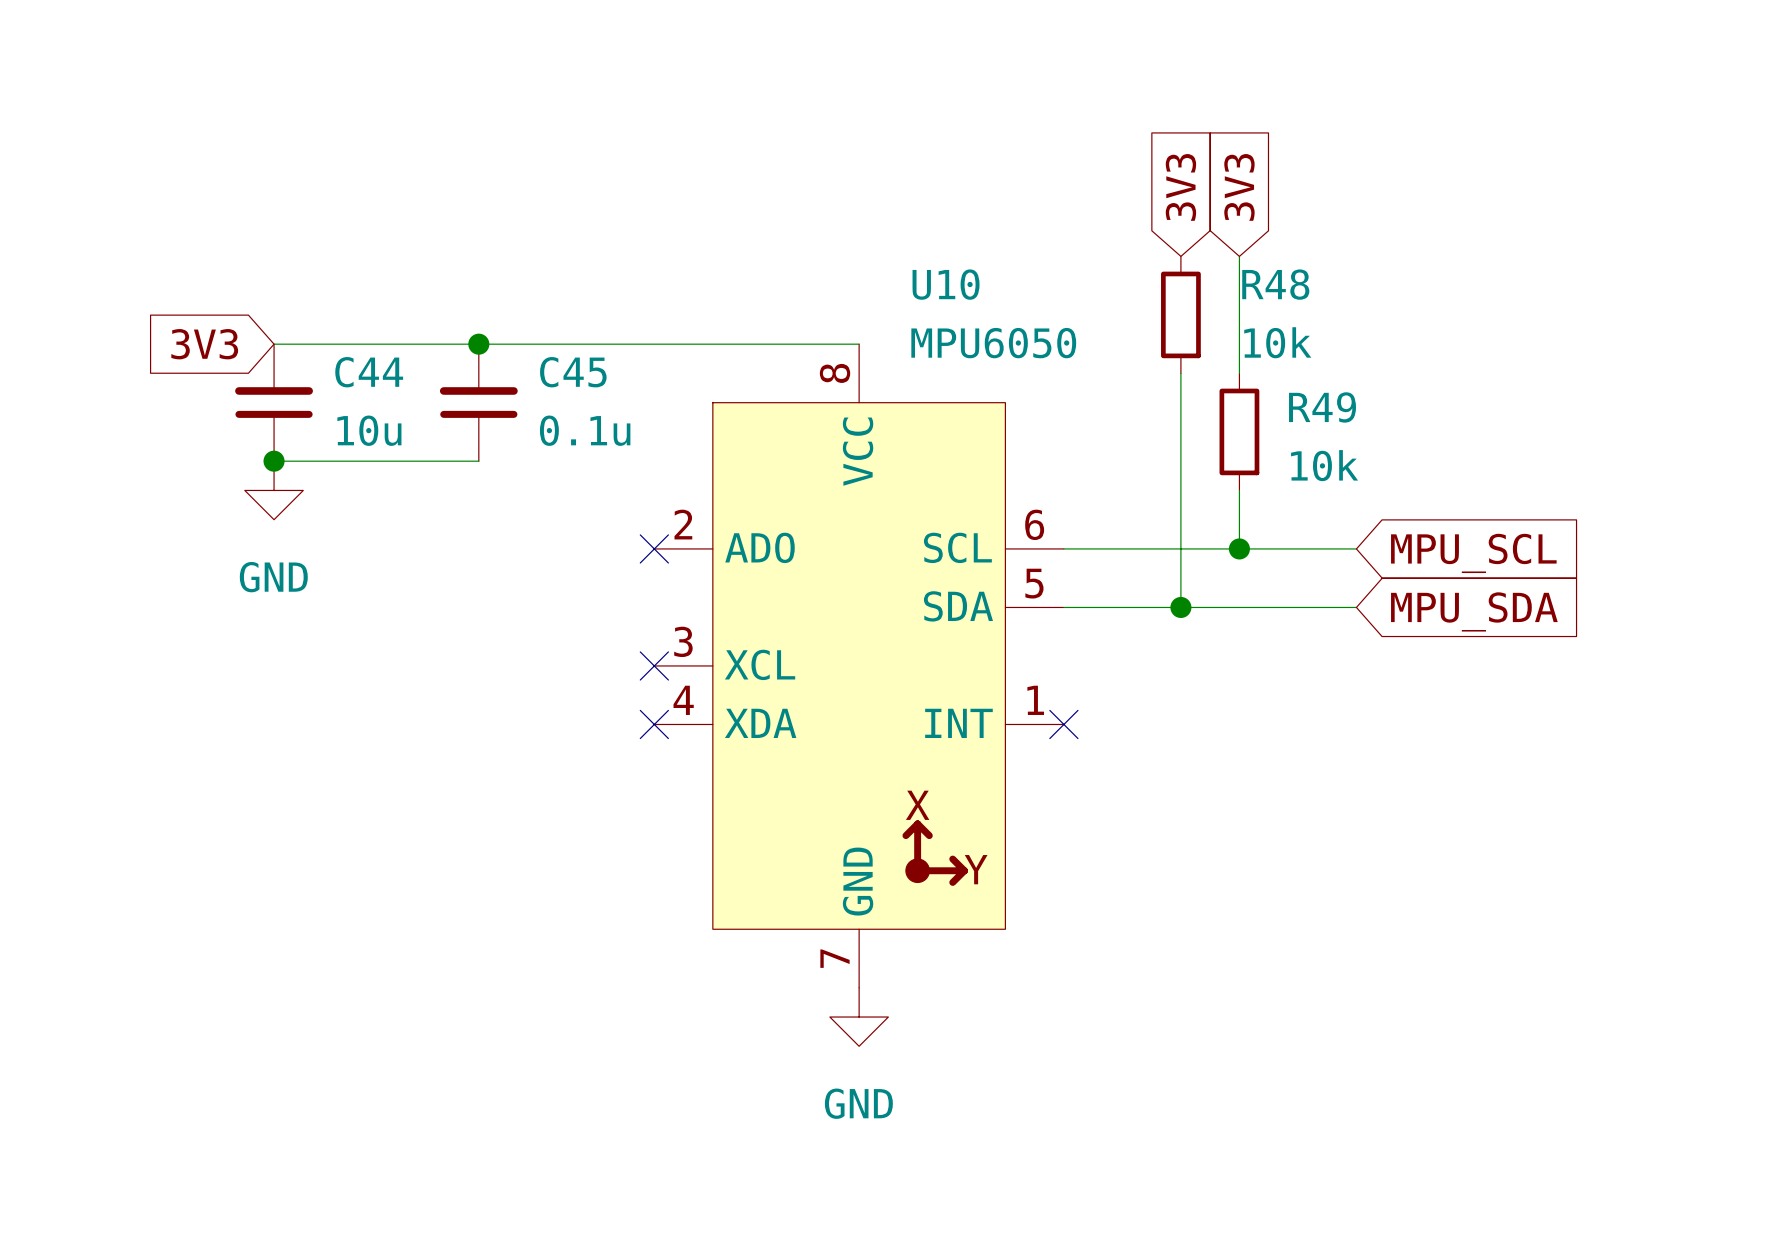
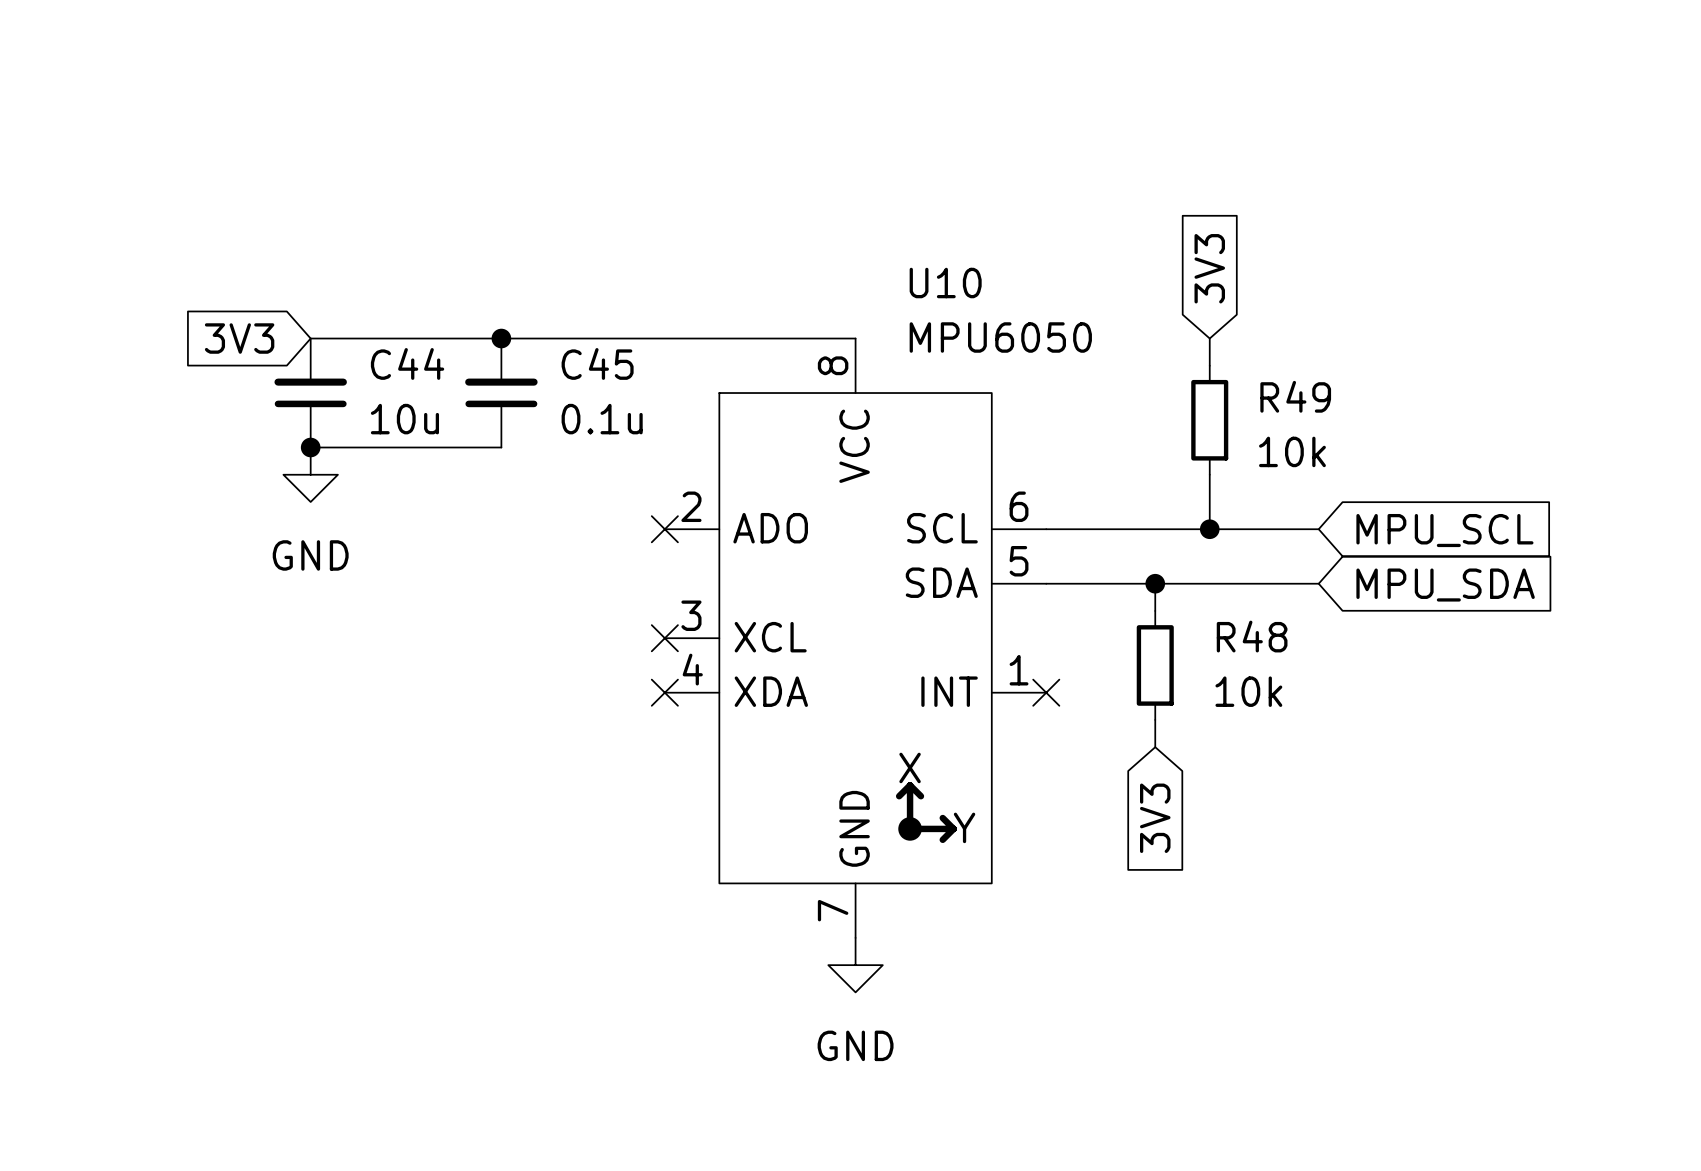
global label: 3V3 (1180, 187) -> none
global label: 3V3 (1239, 187) -> none
wire: (1239, 256) (1239, 344) -> none
global label: none -> 3V3 (1209, 268)
R48 position: (1180, 314) -> (1155, 665)
wire: (1180, 373) (1180, 607) -> (1155, 610) (1155, 583)
wire: none -> (1155, 719) (1155, 747)
global label: none -> 3V3 (1155, 818)

